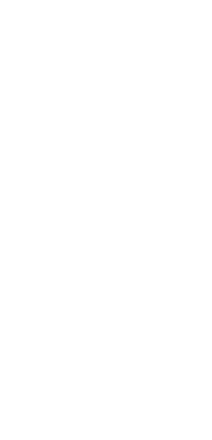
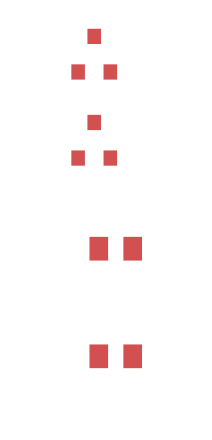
part: none -> (94, 54)
part: none -> (94, 140)
part: none -> (115, 248)
part: none -> (115, 356)

